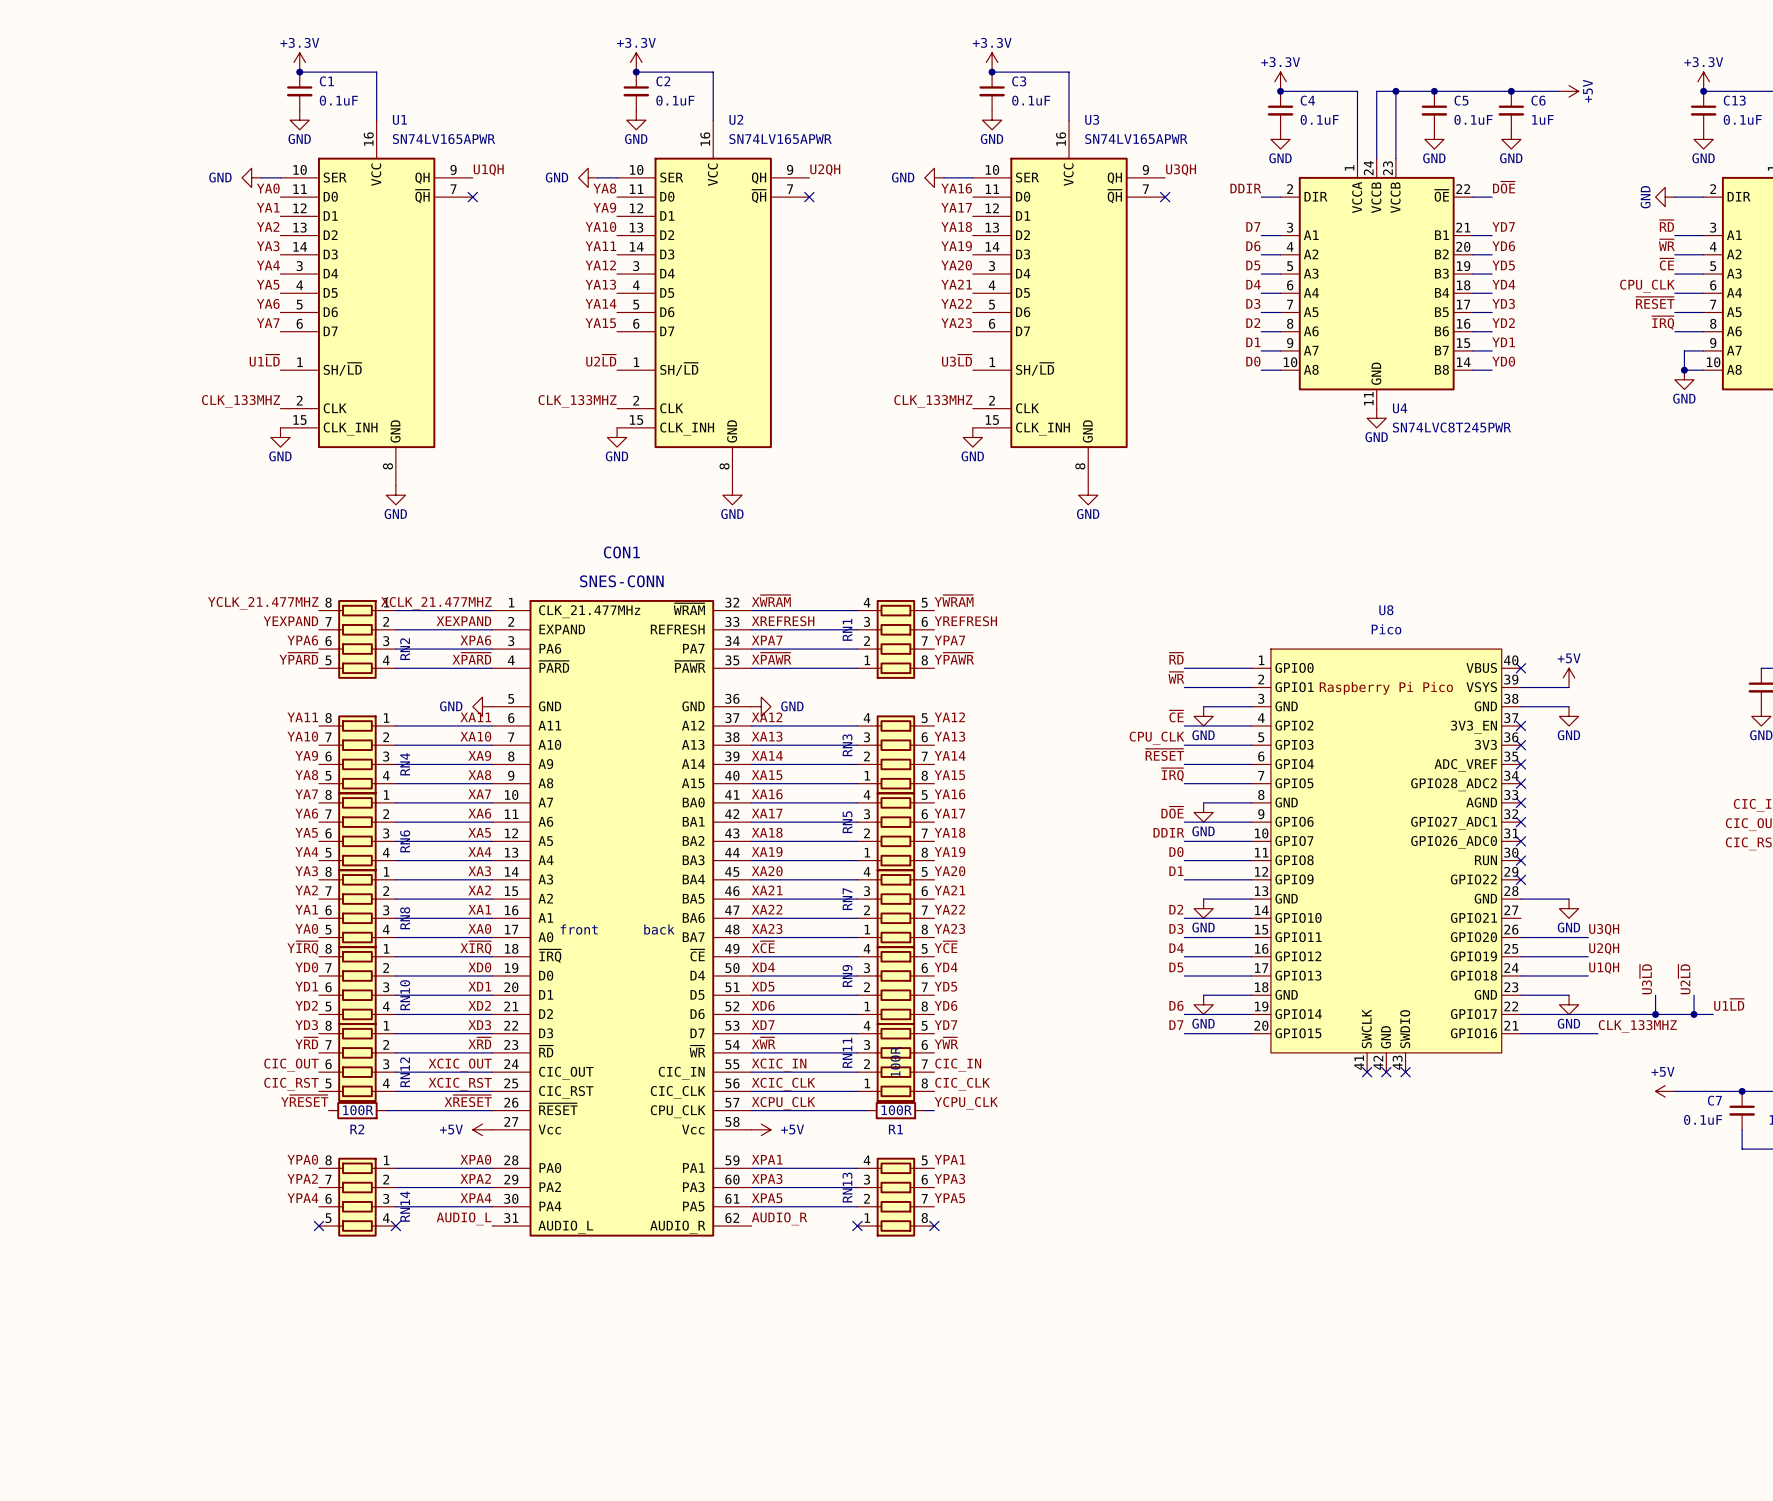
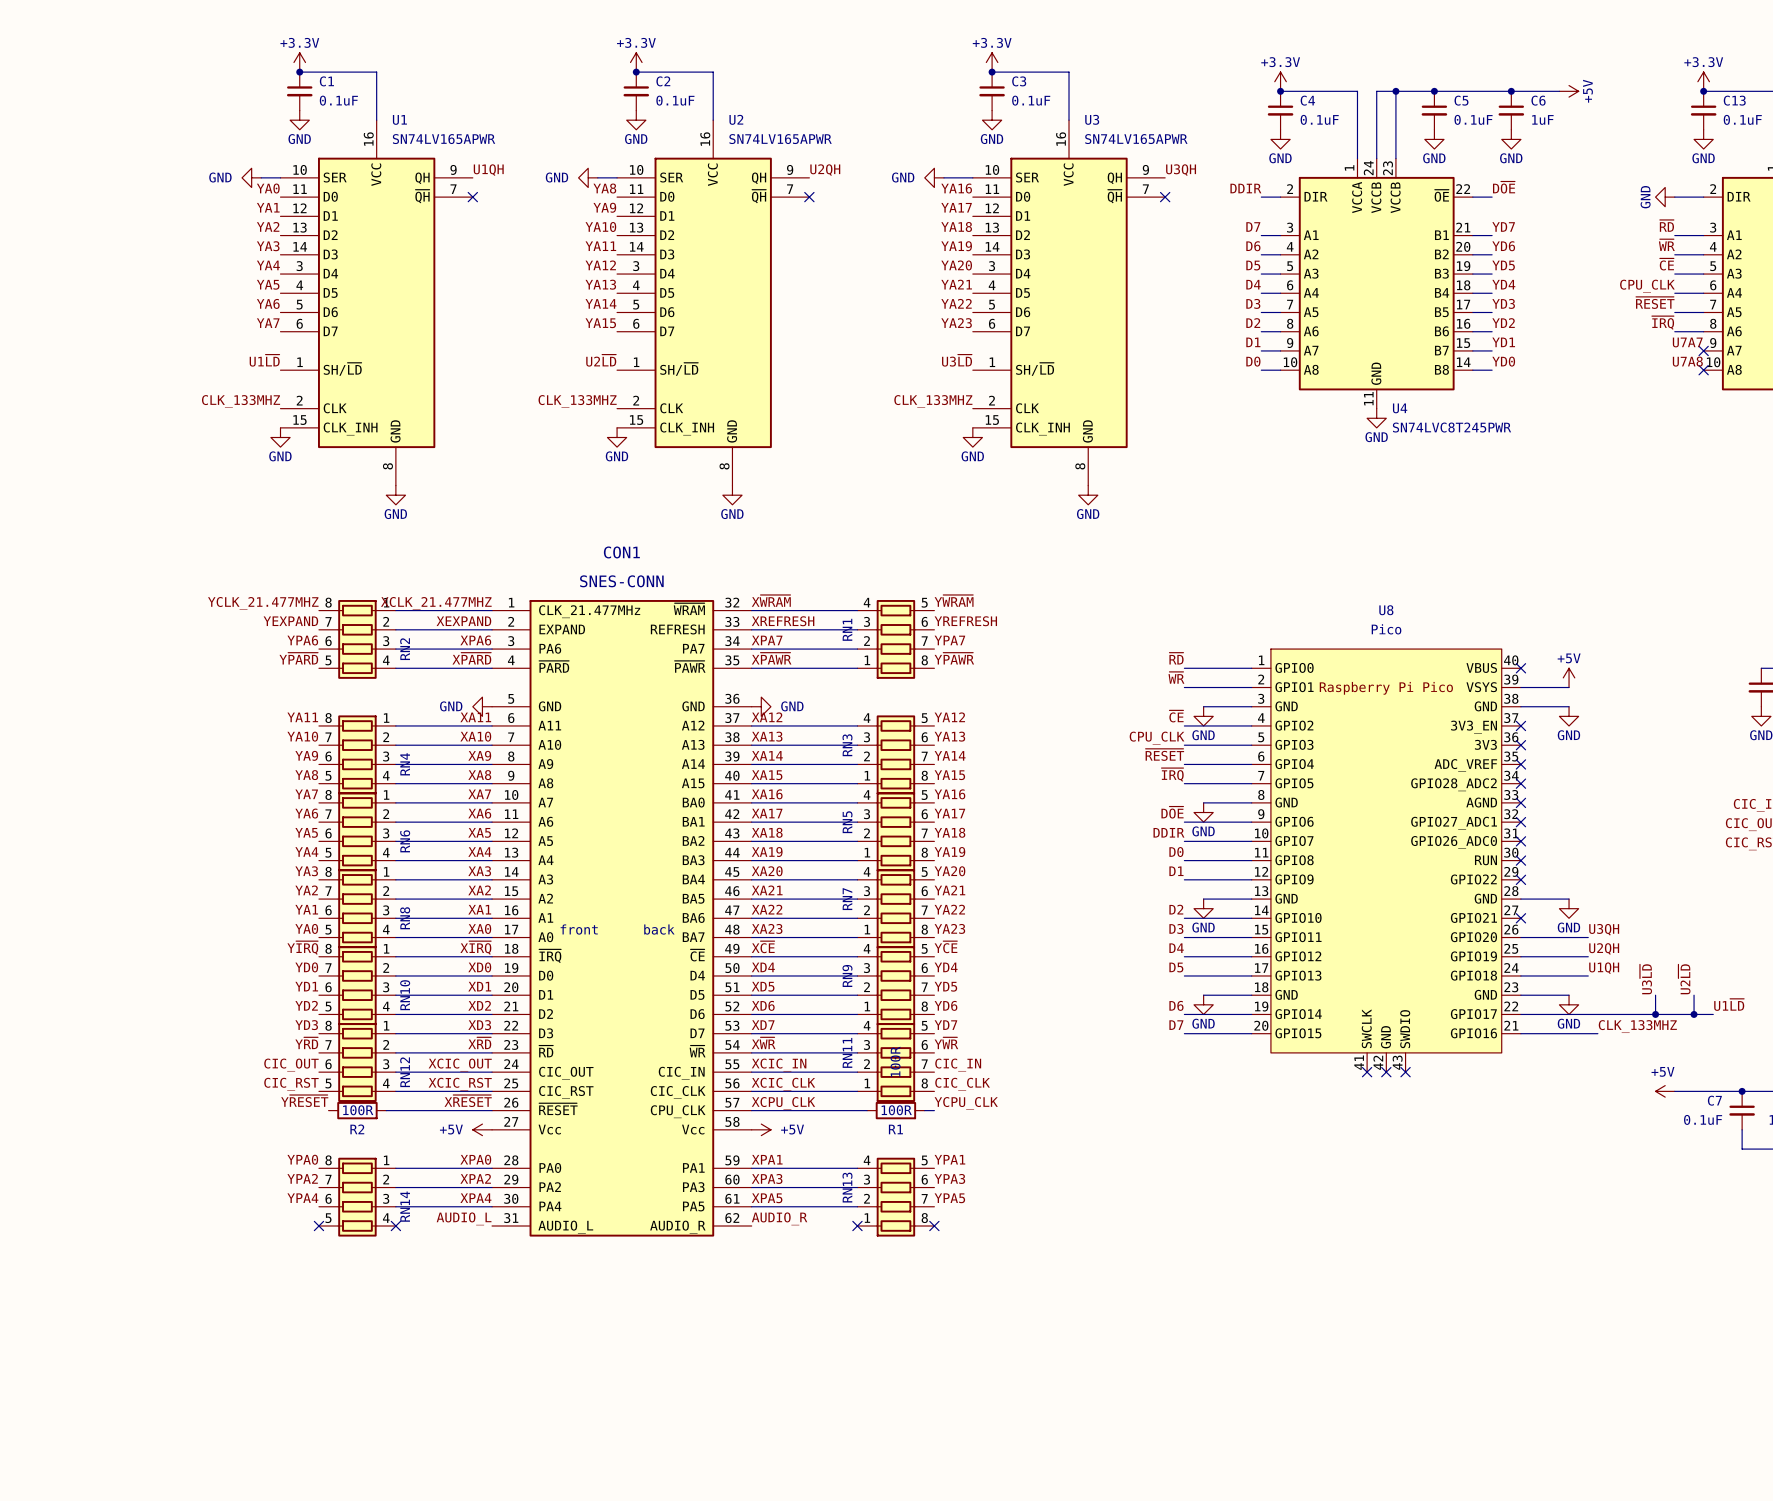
label: none -> U7A7 (1687, 342)
wire: (1703, 350) (1684, 350) (1684, 370) (1703, 370) -> none
no-connect mark: none -> (1703, 350)
label: none -> U7A8 (1687, 361)
junction: (1684, 370) -> none
no-connect mark: none -> (1703, 370)
power symbol: GND (1684, 379) -> none
no-connect mark: none -> (1520, 918)

